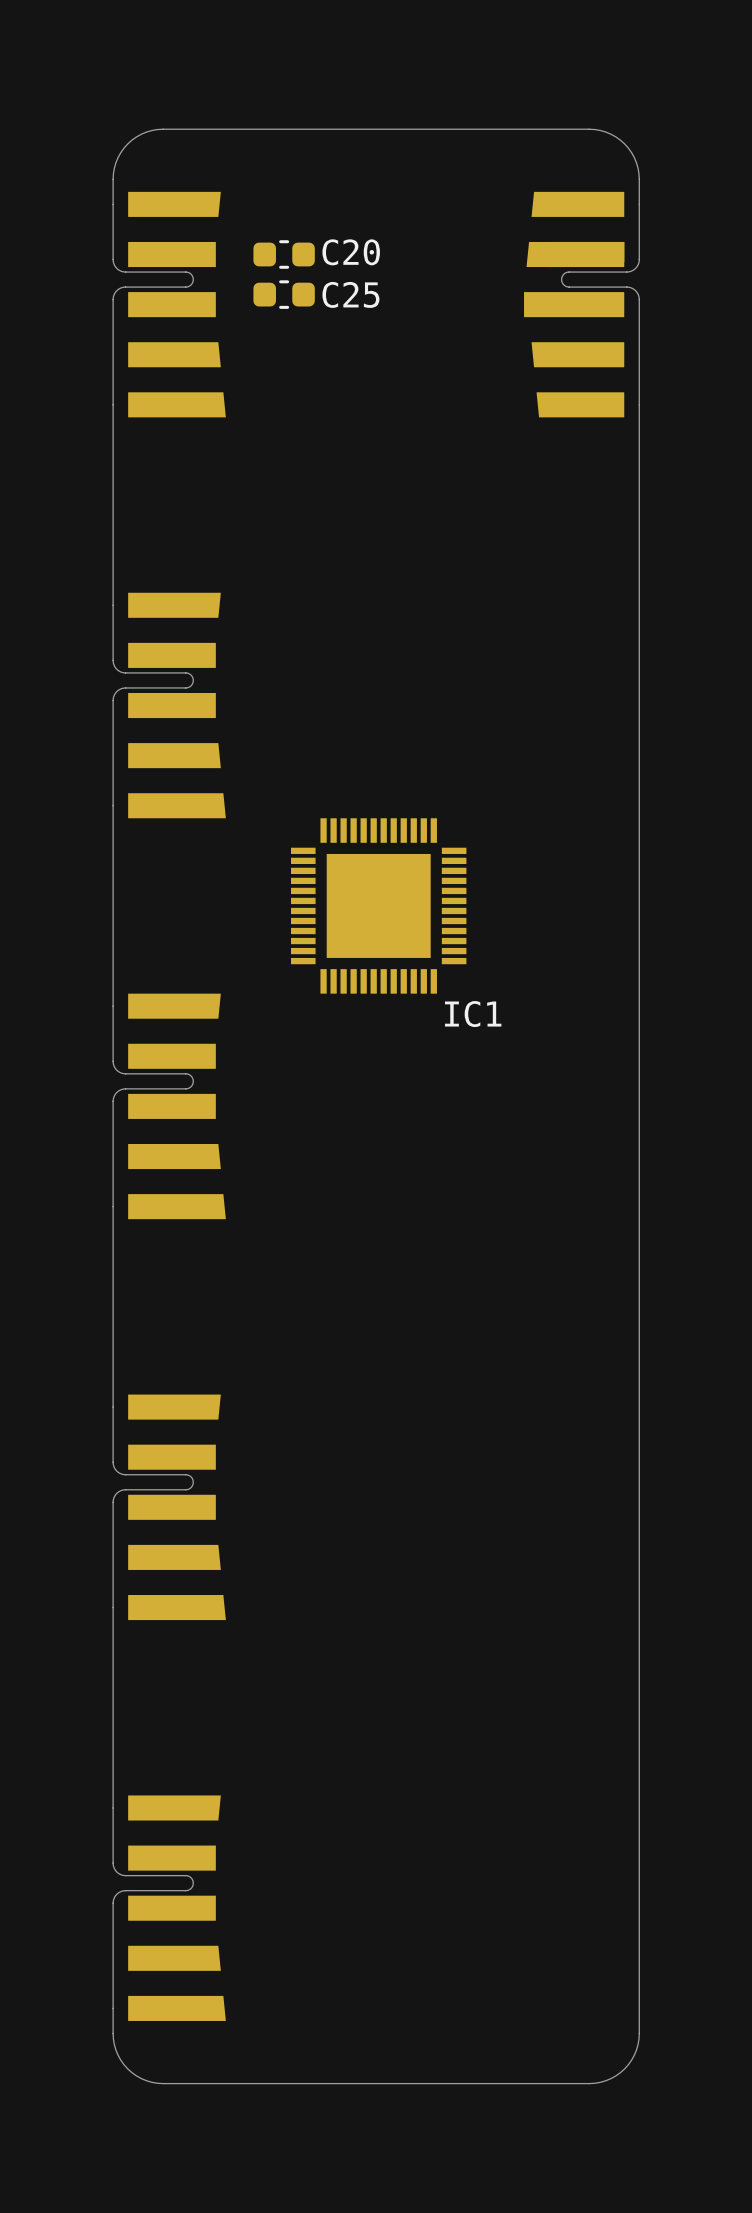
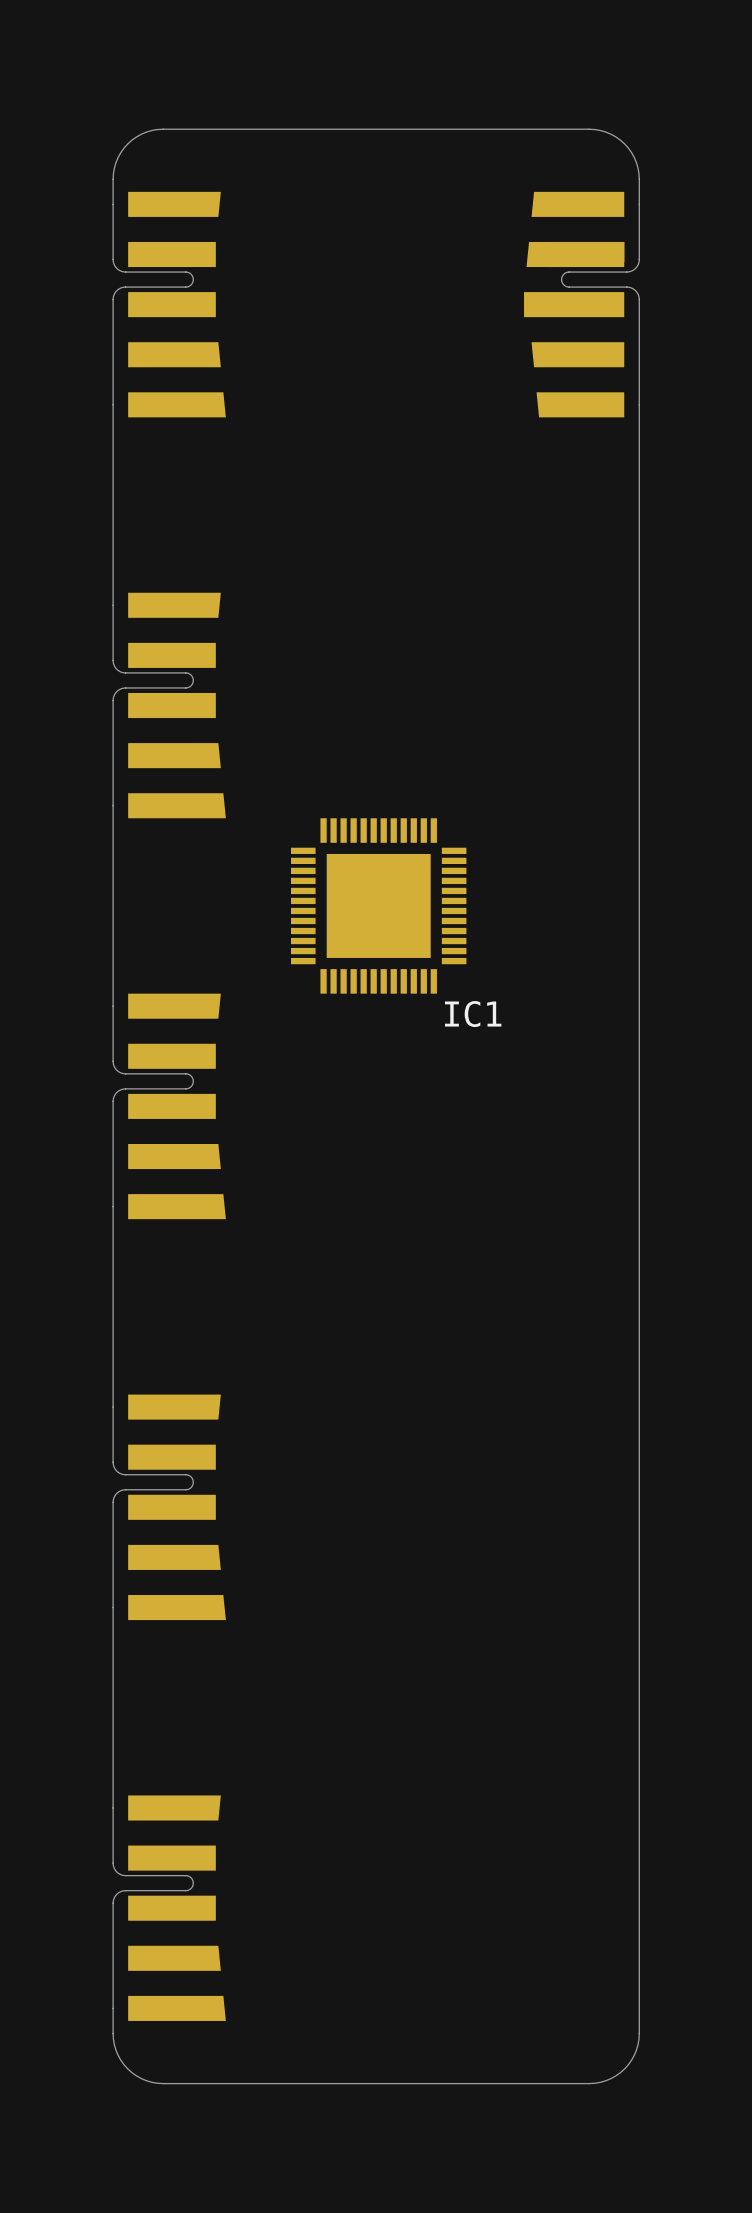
C20: (284, 254) -> none
C25: (284, 294) -> none

